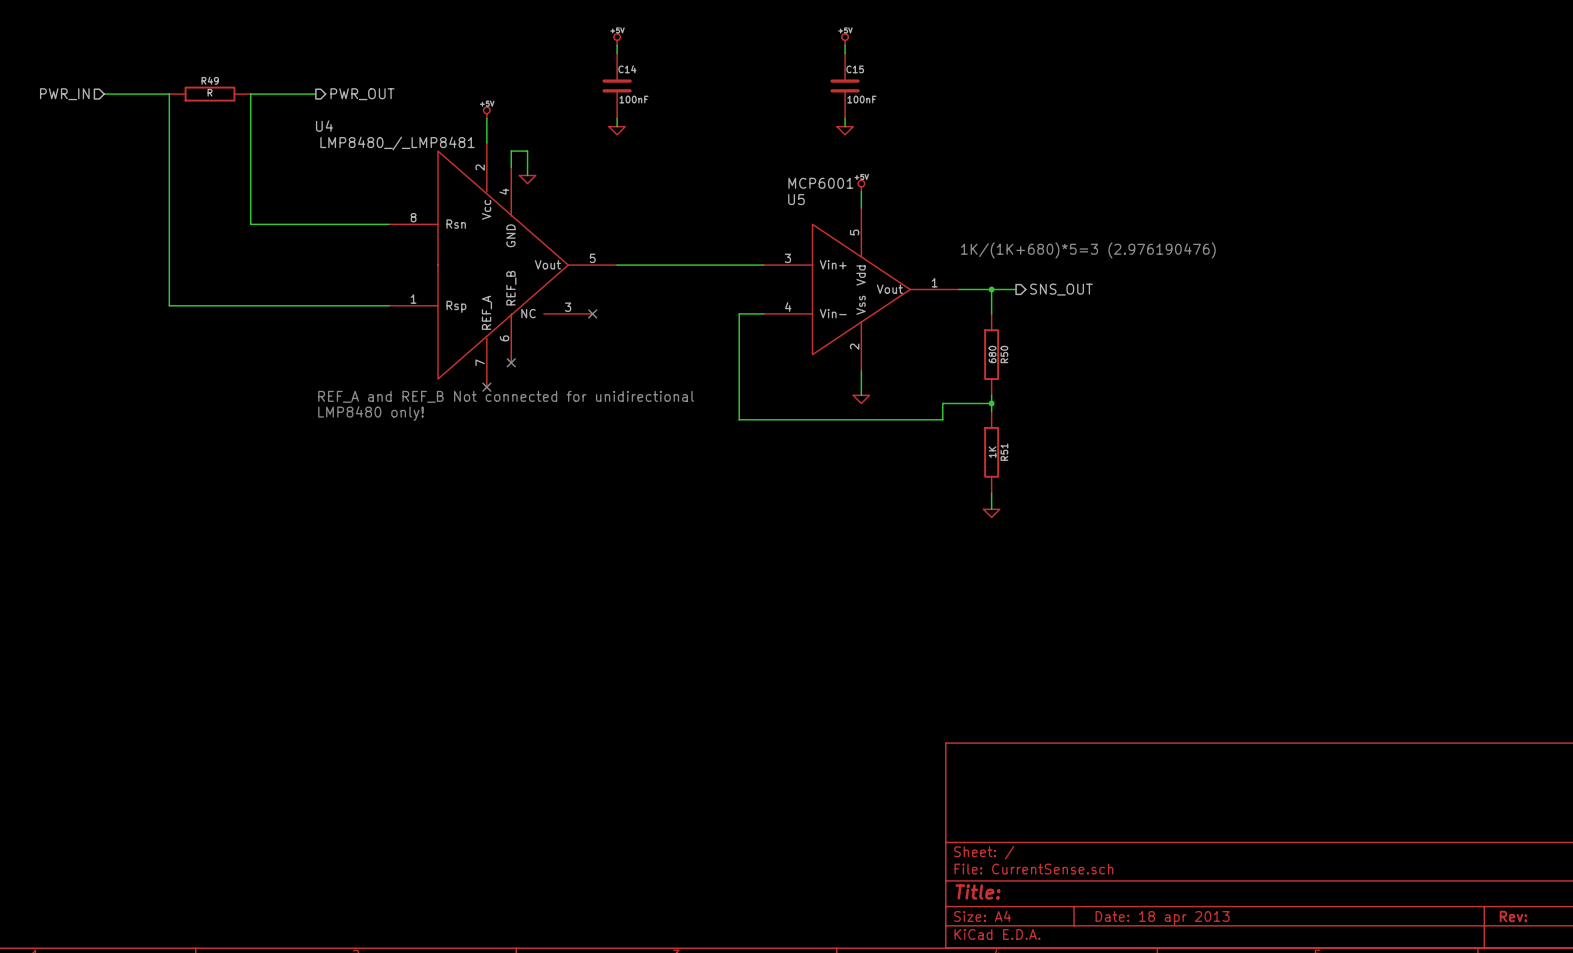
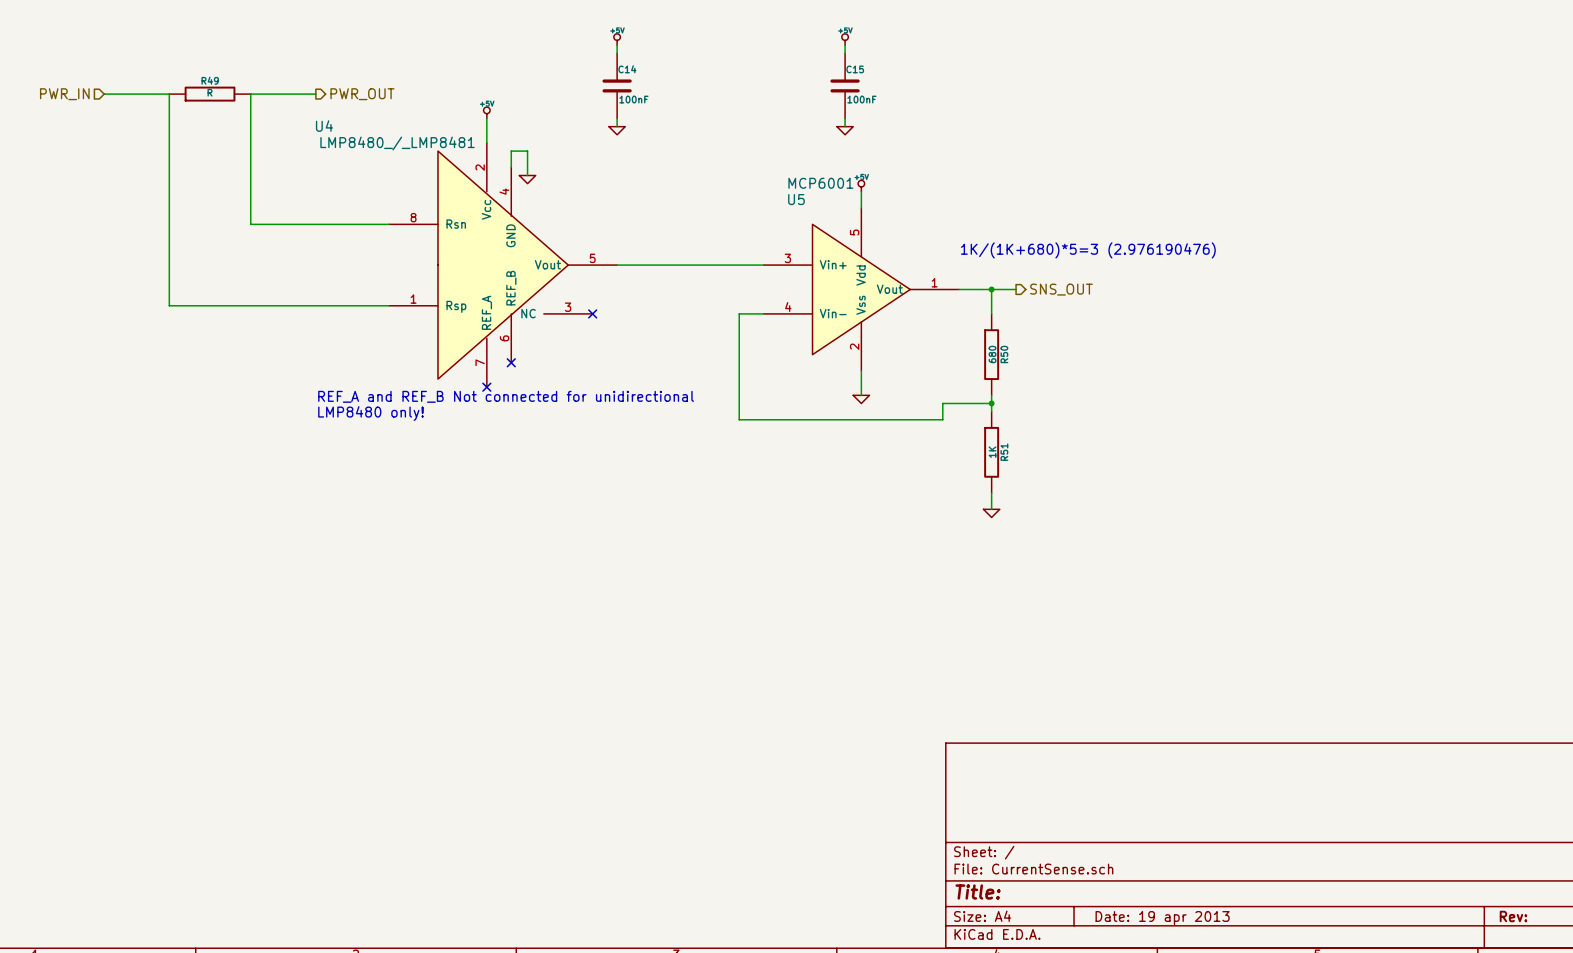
title block: Date: 18 apr 2013 (1162, 918) -> Date: 19 apr 2013 (1162, 918)

